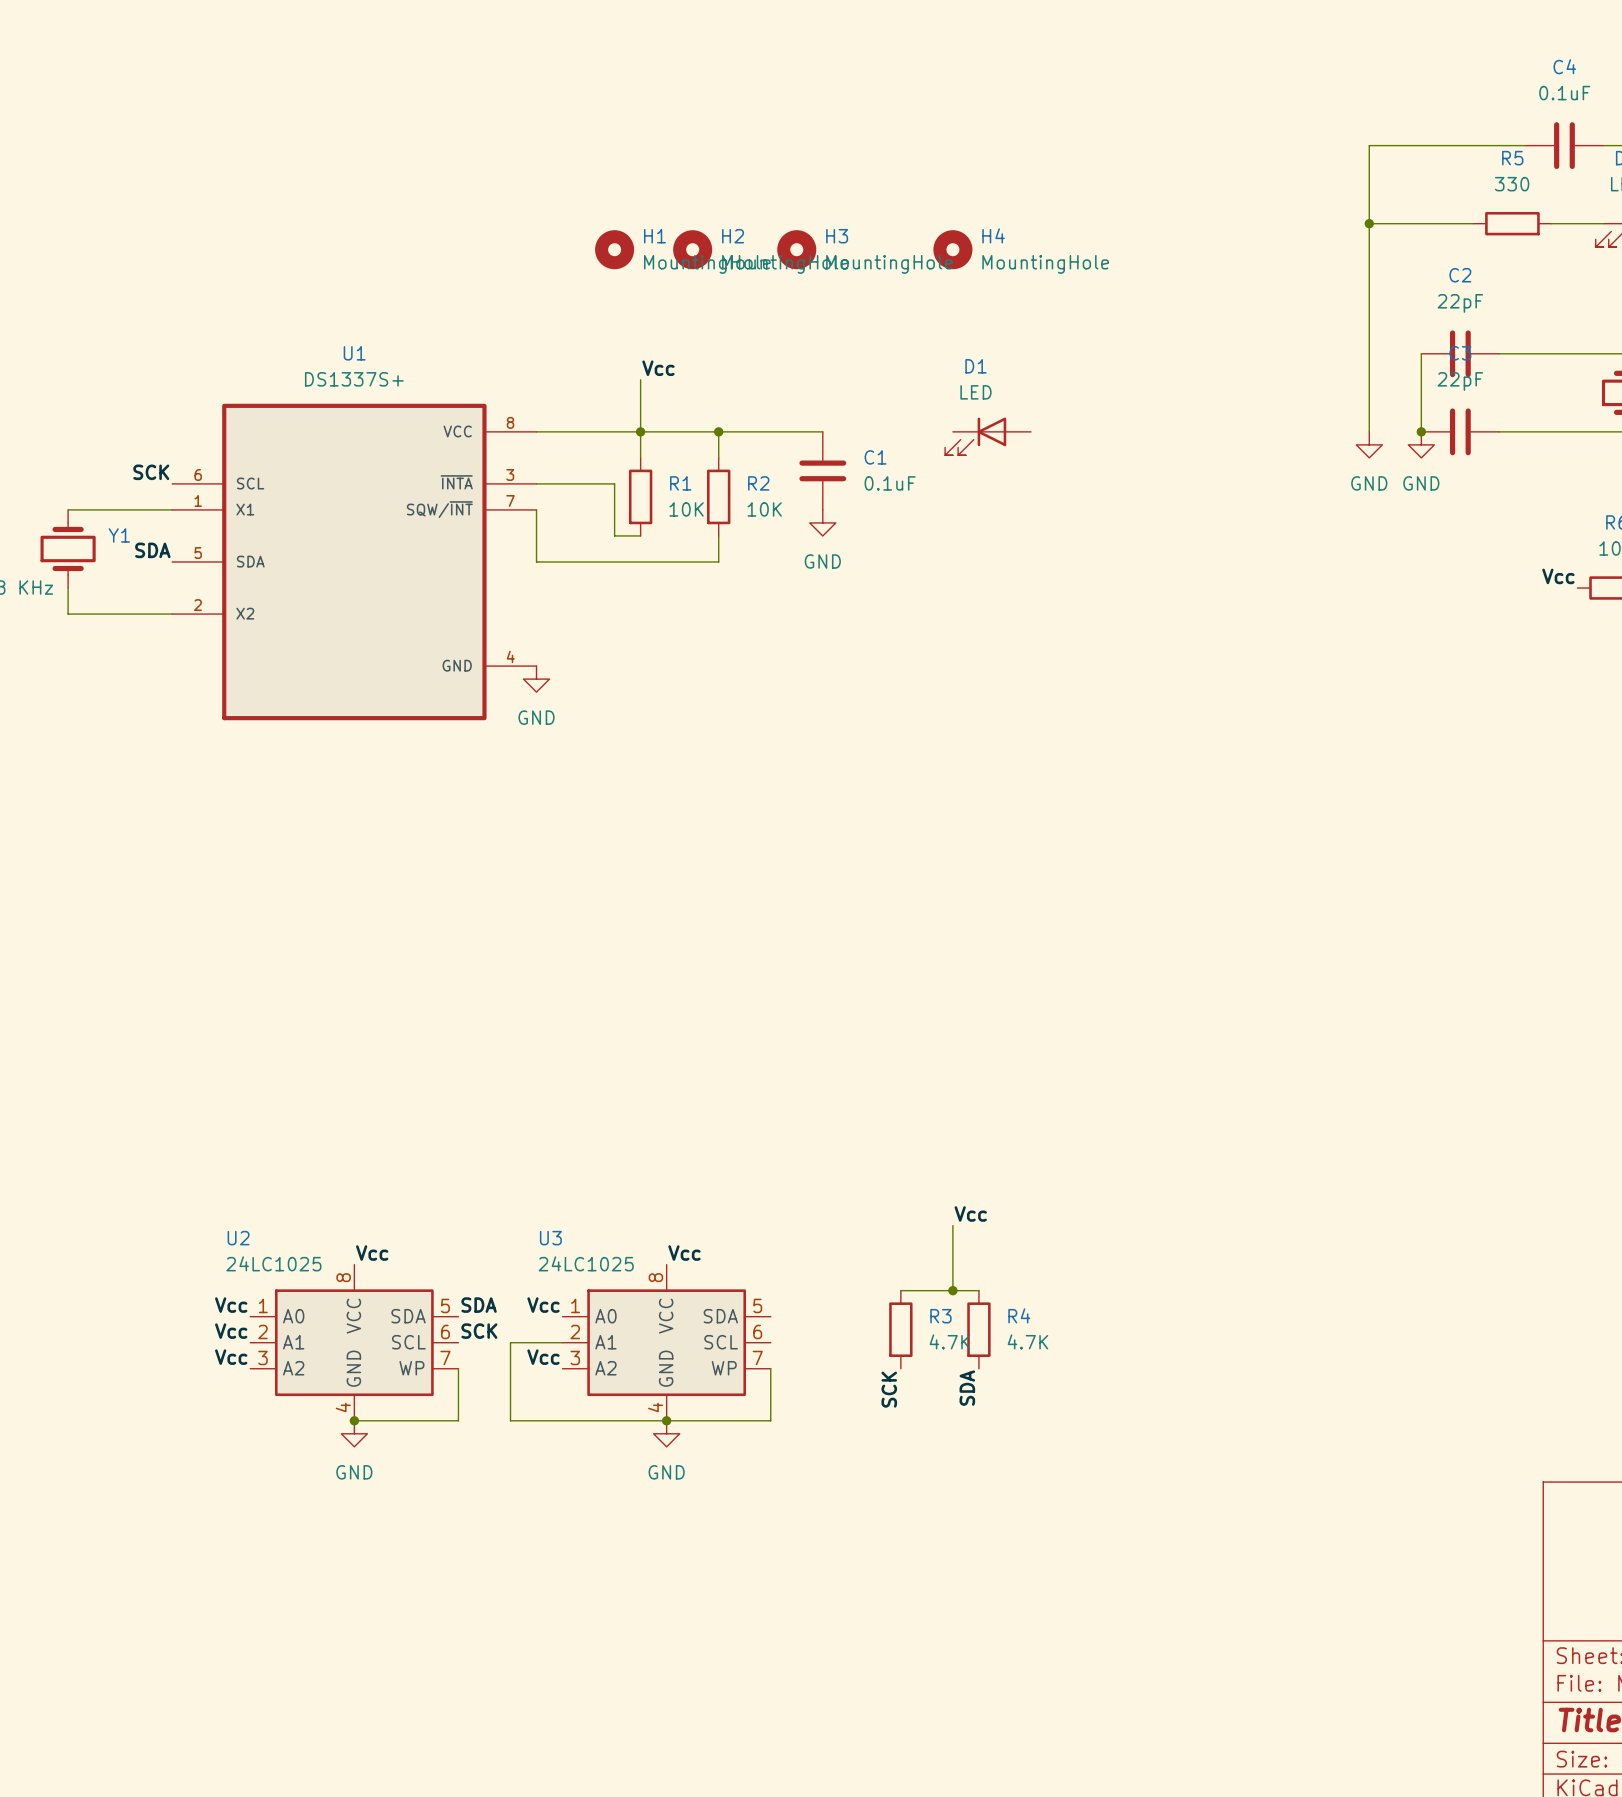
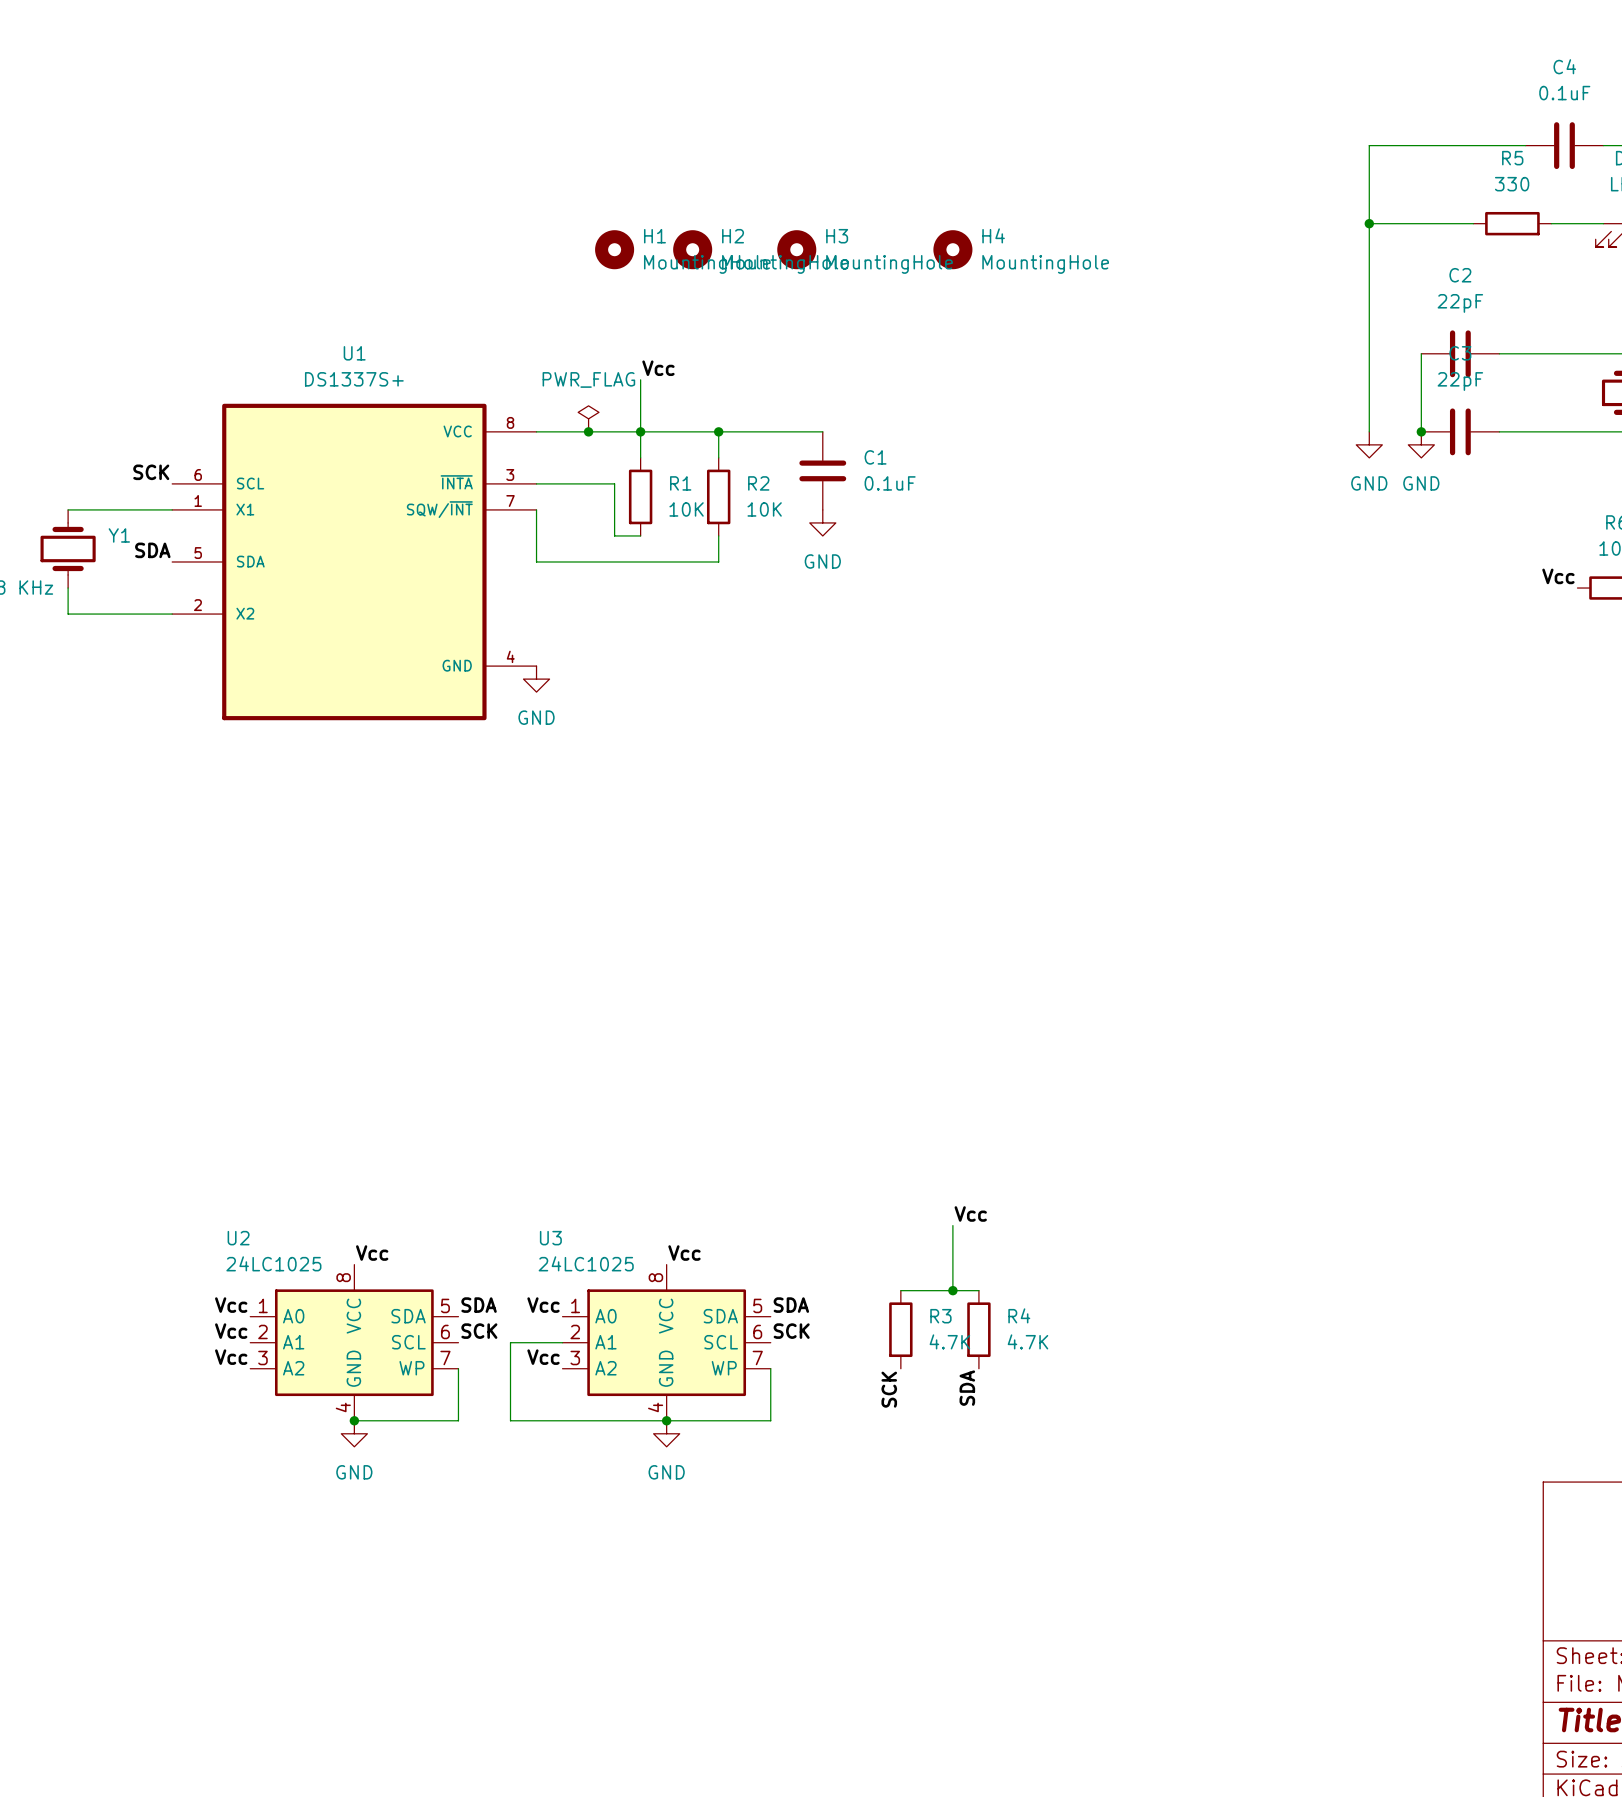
power symbol: none -> PWR_FLAG (588, 418)
junction: none -> (588, 431)
D1: LED (988, 436) -> none
label: none -> SDA (791, 1305)
label: none -> SCK (791, 1331)

